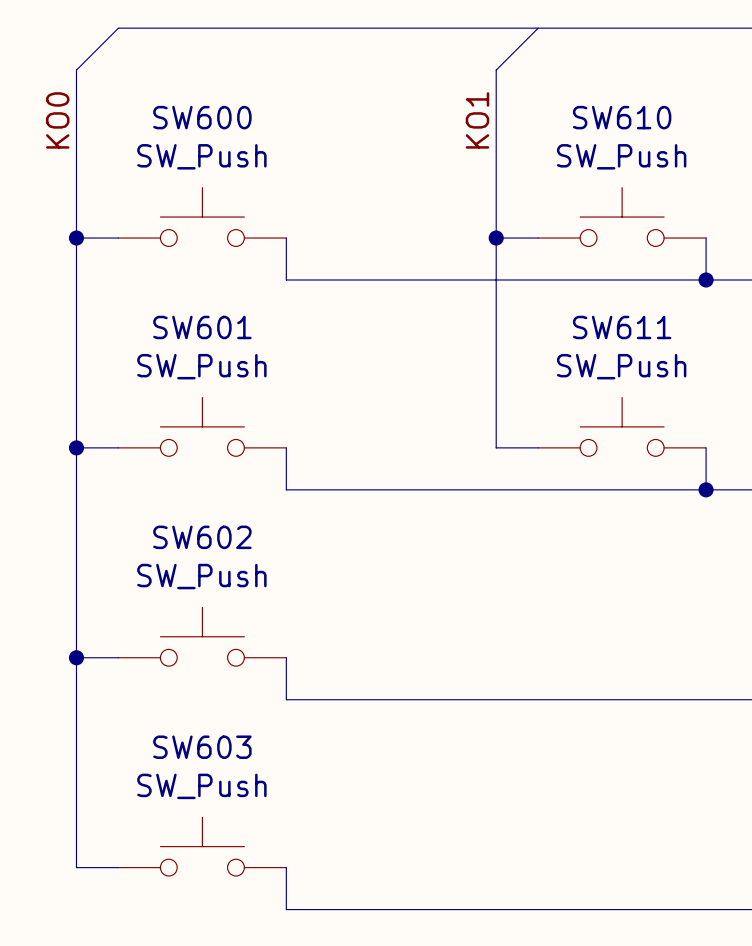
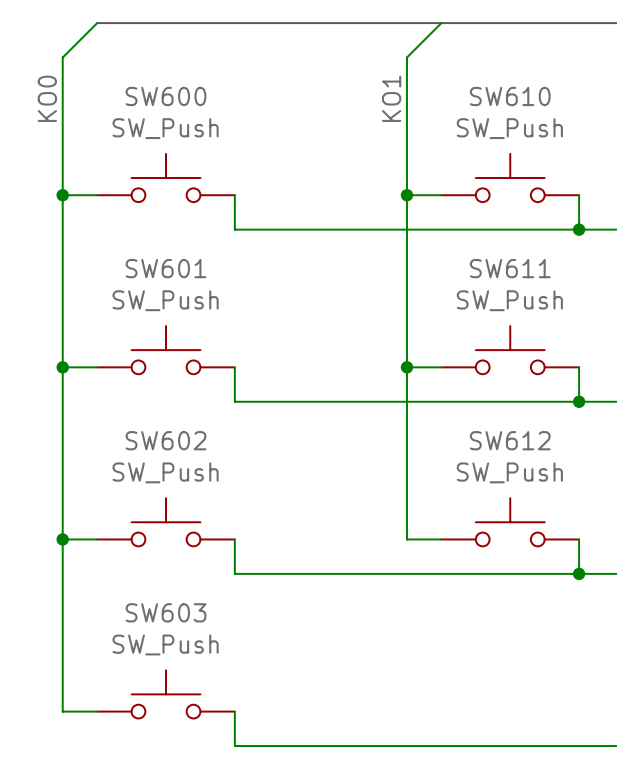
wire: none -> (406, 367) (406, 539) (441, 539)
junction: none -> (406, 367)
SW612: none -> SW_Push (510, 522)
wire: none -> (579, 539) (579, 573)
junction: none -> (579, 573)

